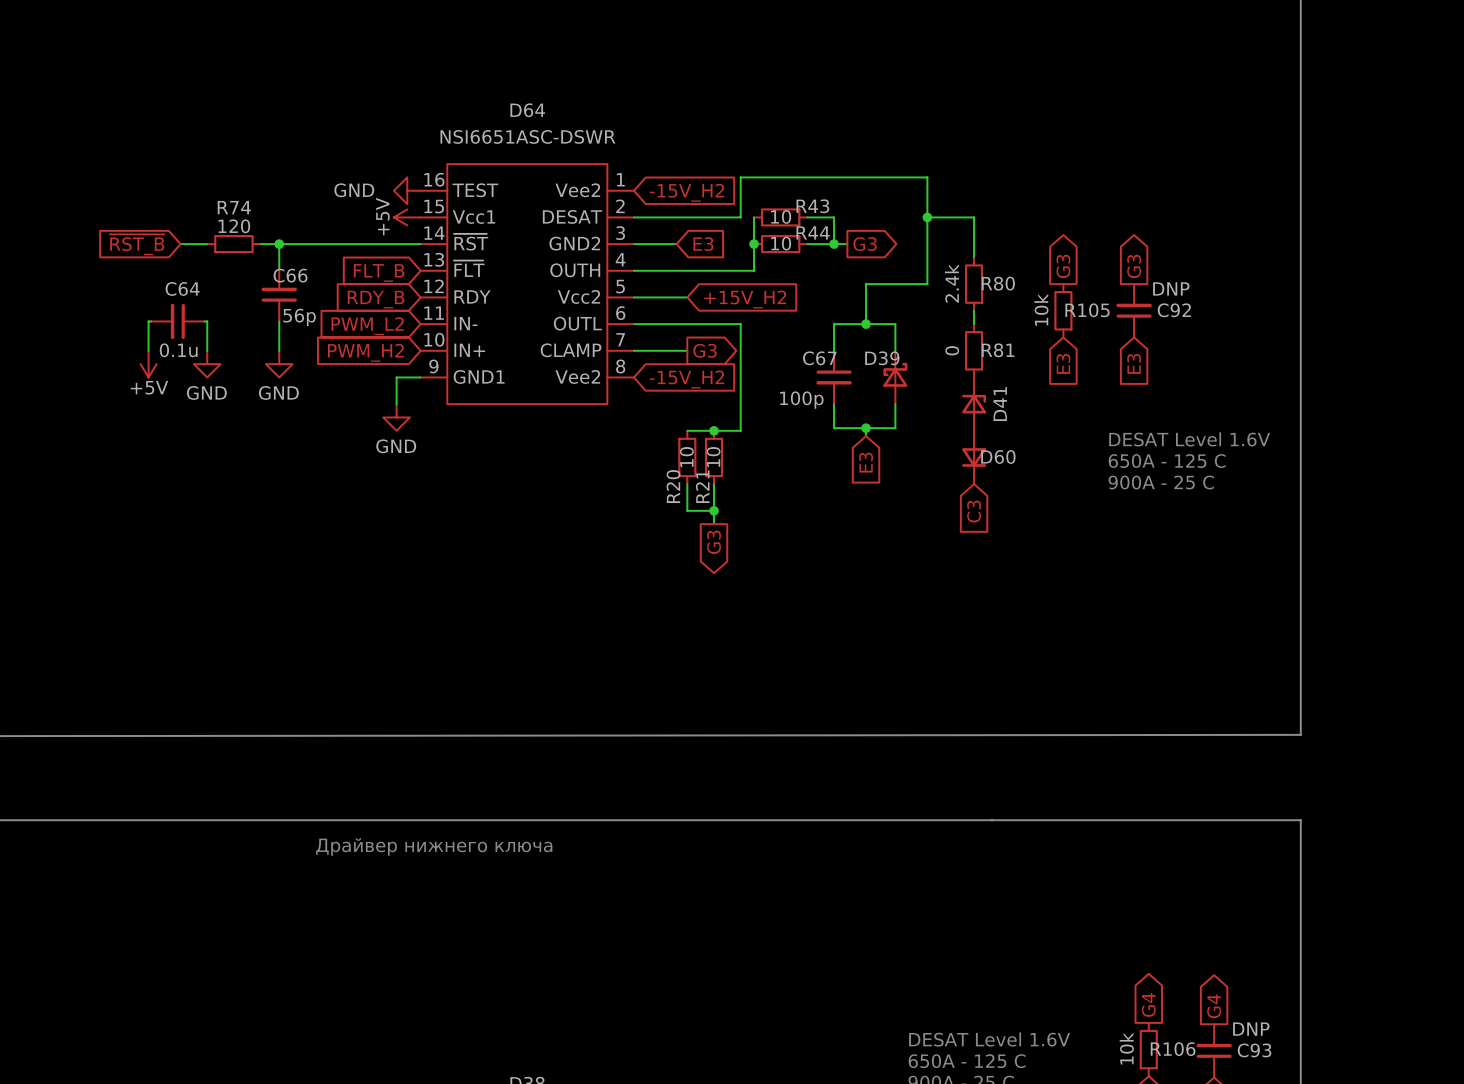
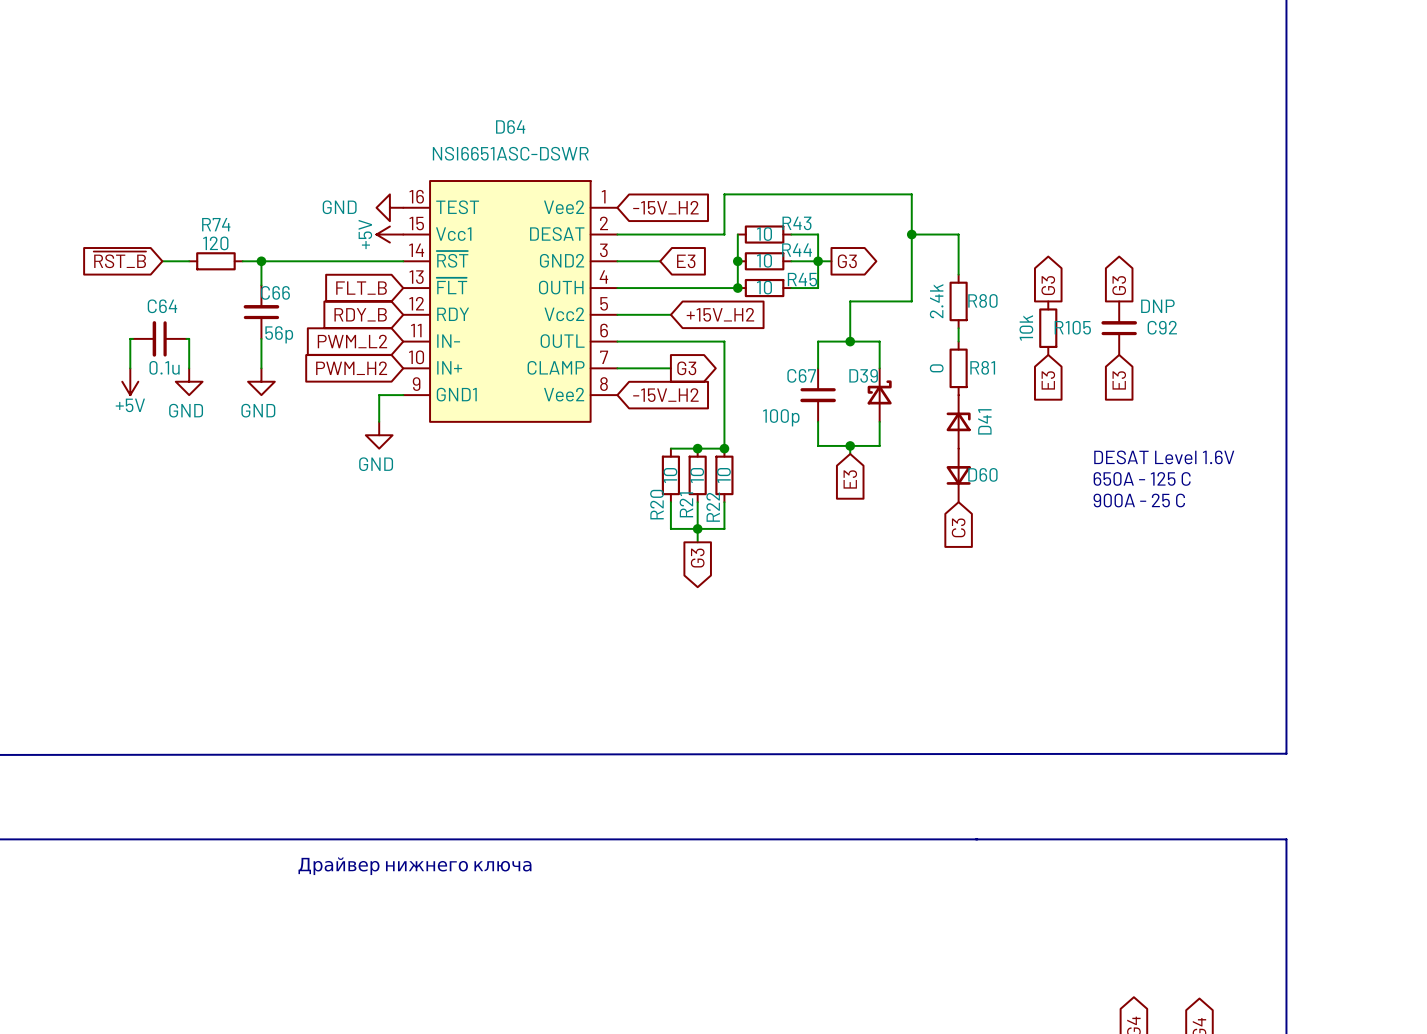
wire: none -> (818, 261) (818, 288) (791, 288)
junction: none -> (737, 288)
R45: none -> 10 (764, 288)
junction: none -> (724, 448)
R22: none -> 10 (724, 475)
wire: none -> (724, 502) (724, 528) (697, 528)

